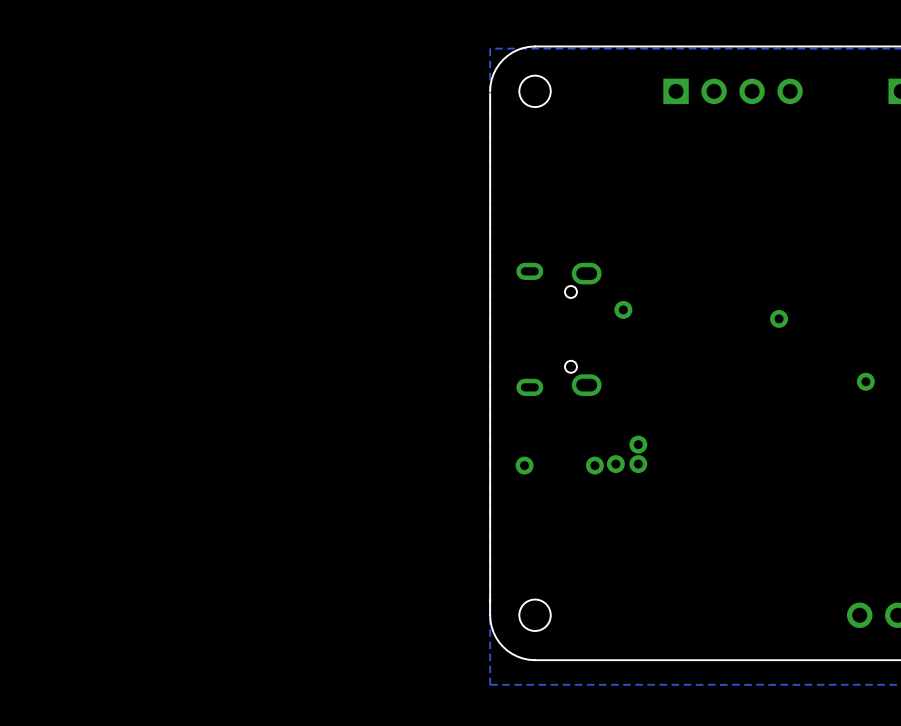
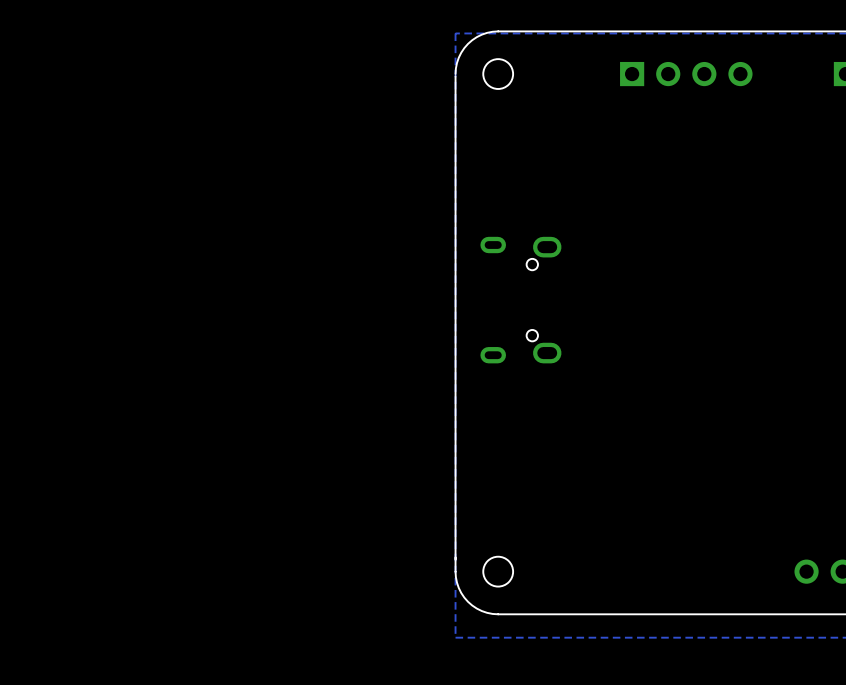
via: (623, 309) -> none
via: (779, 318) -> none
via: (865, 381) -> none
via: (638, 444) -> none
via: (615, 464) -> none
via: (638, 464) -> none
via: (524, 465) -> none
via: (594, 465) -> none

